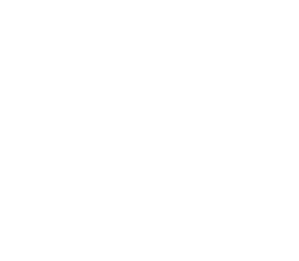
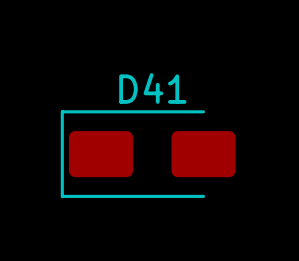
D41: none -> (148, 154)

